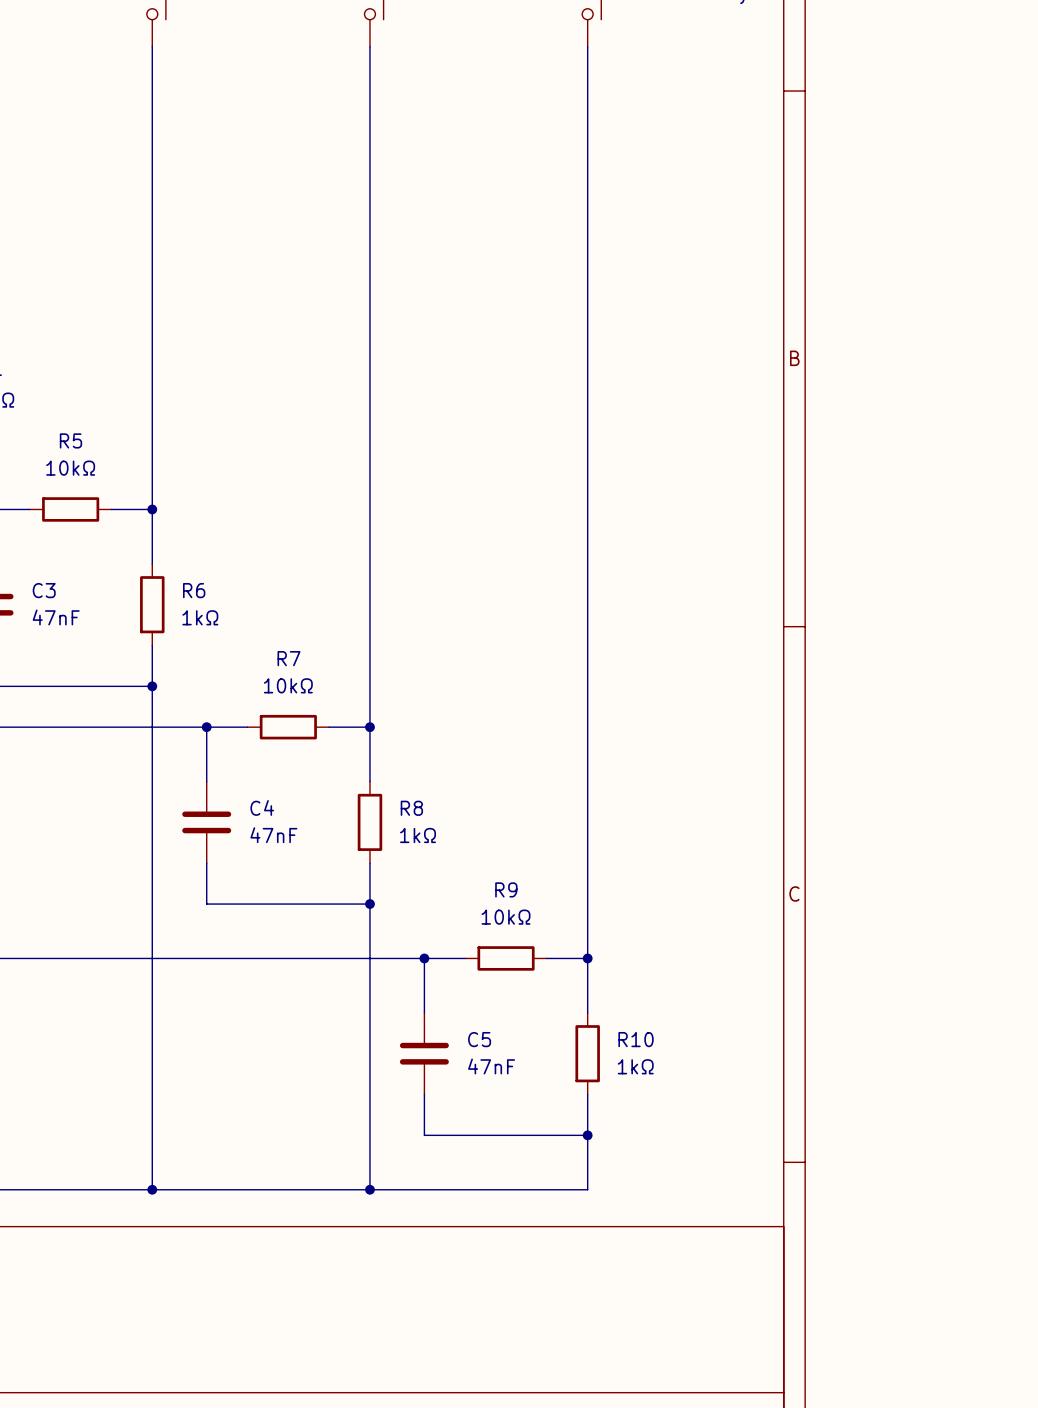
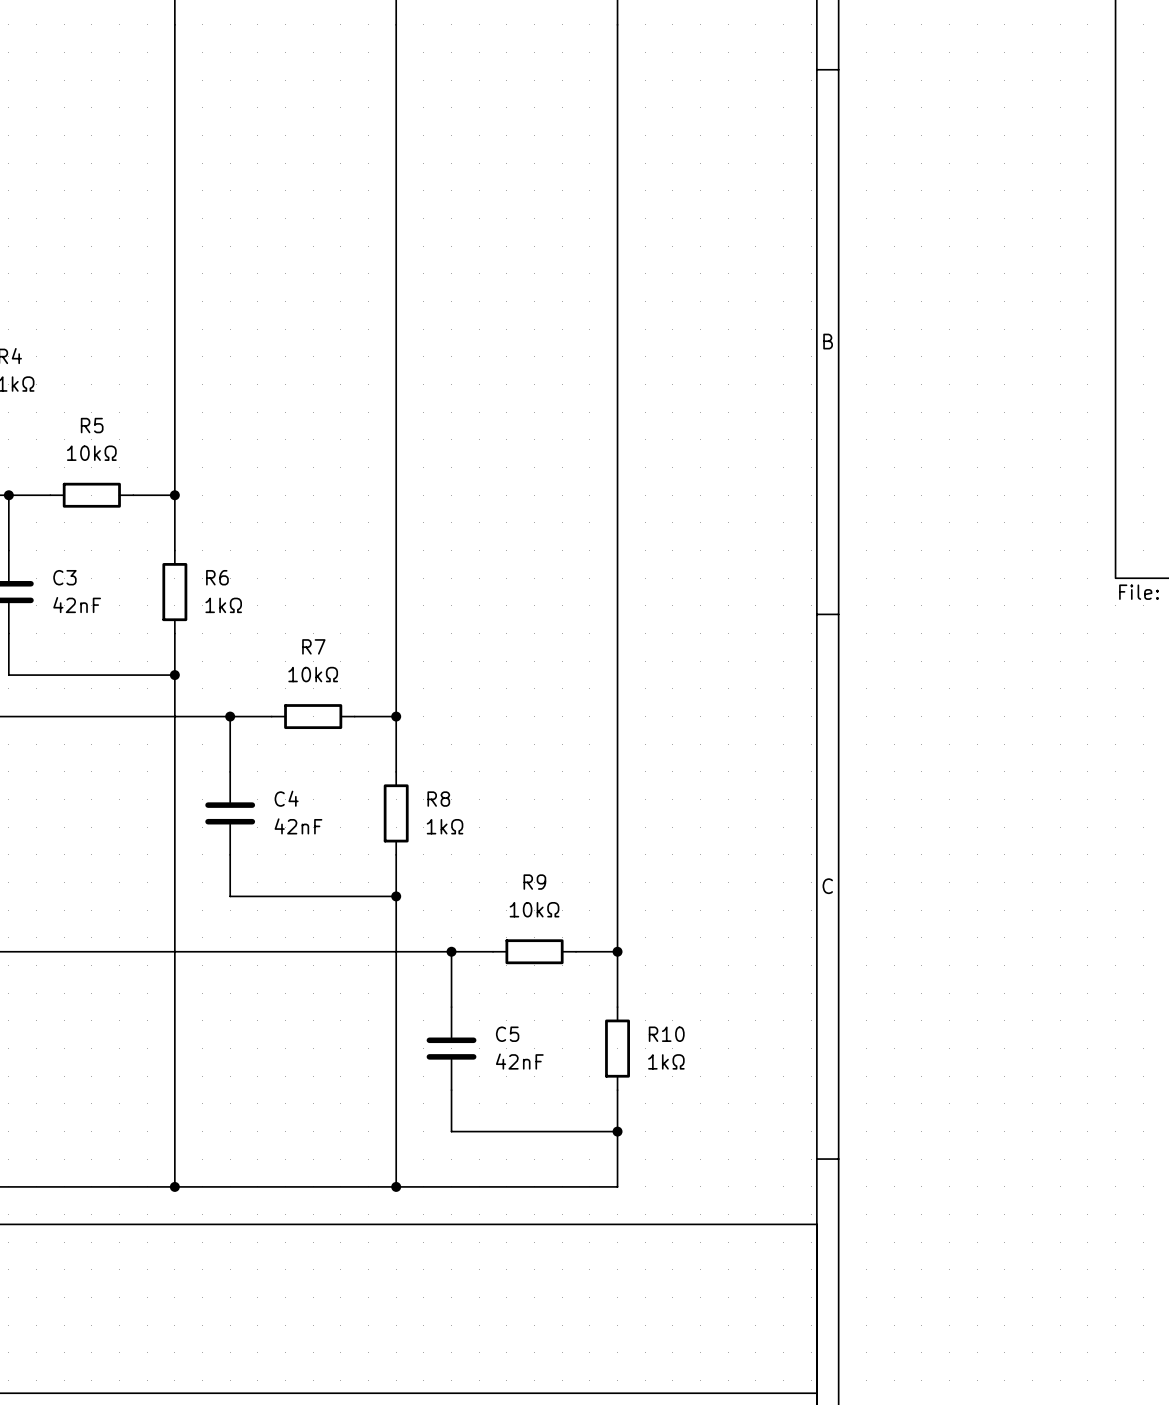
C3 value: 47nF (56, 617) -> 42nF (77, 605)
C4 value: 47nF (273, 835) -> 42nF (298, 826)
C5 value: 47nF (491, 1066) -> 42nF (519, 1061)

